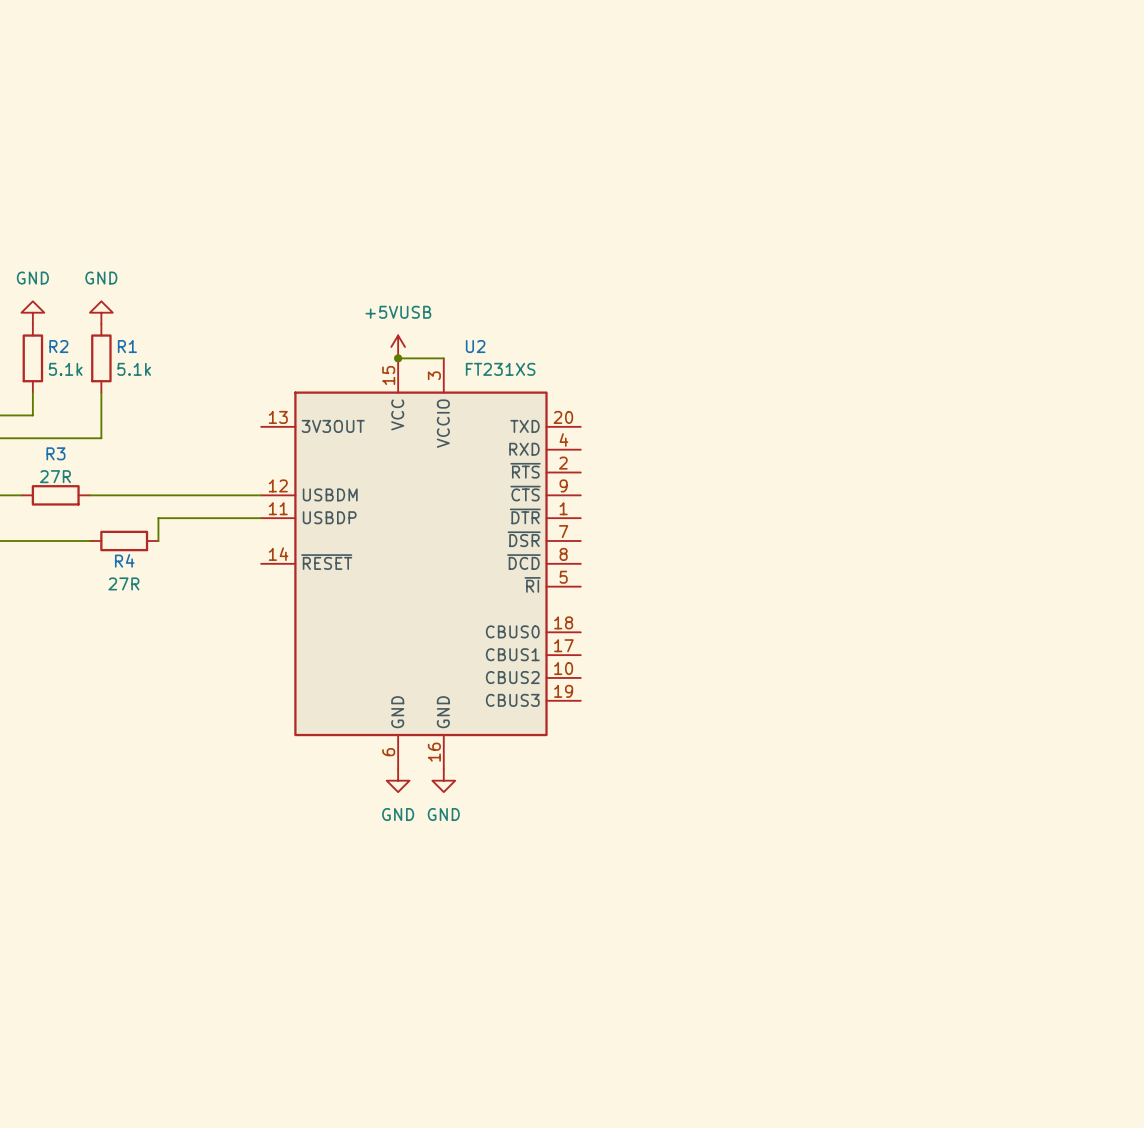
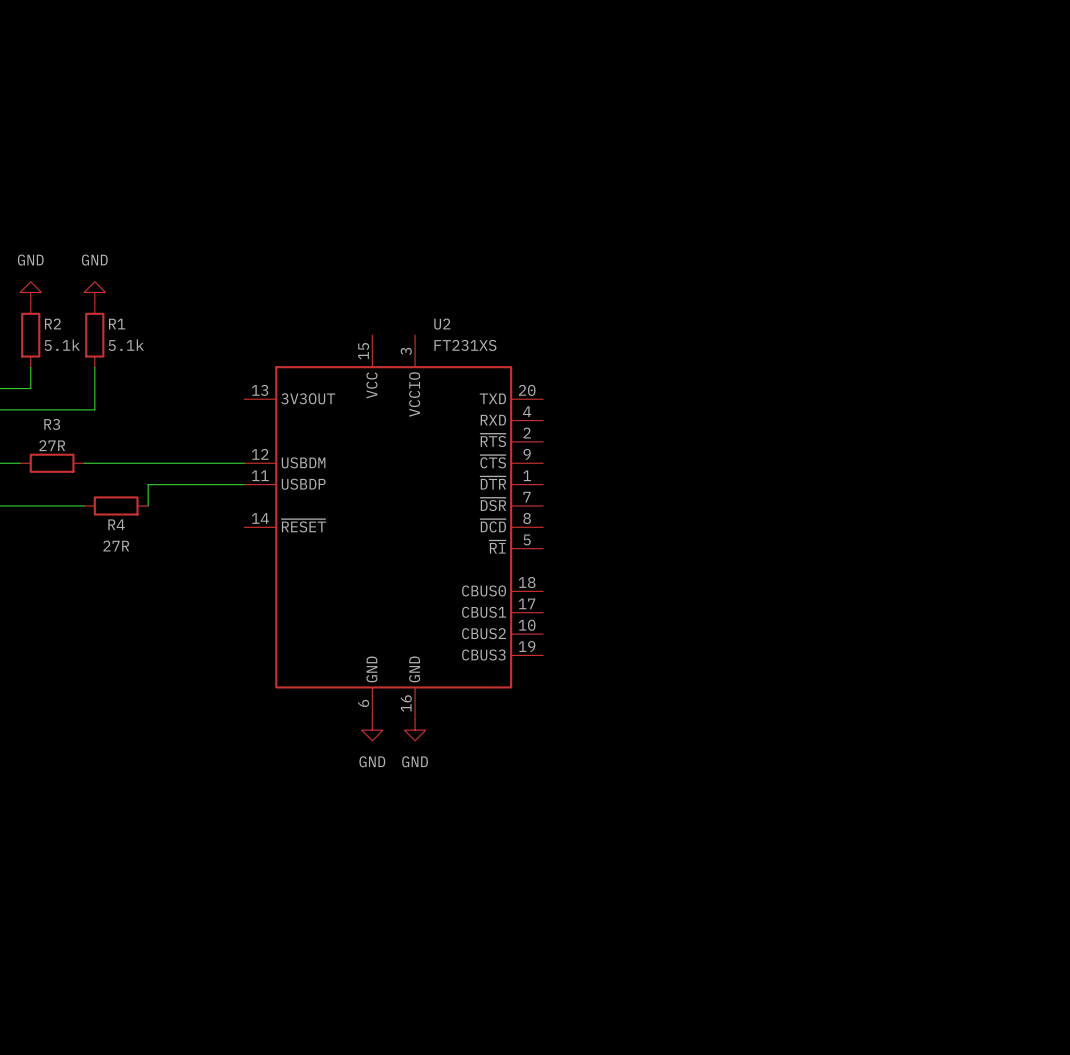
power symbol: +5VUSB (398, 346) -> none
wire: (398, 358) (443, 358) -> none
junction: (398, 358) -> none

